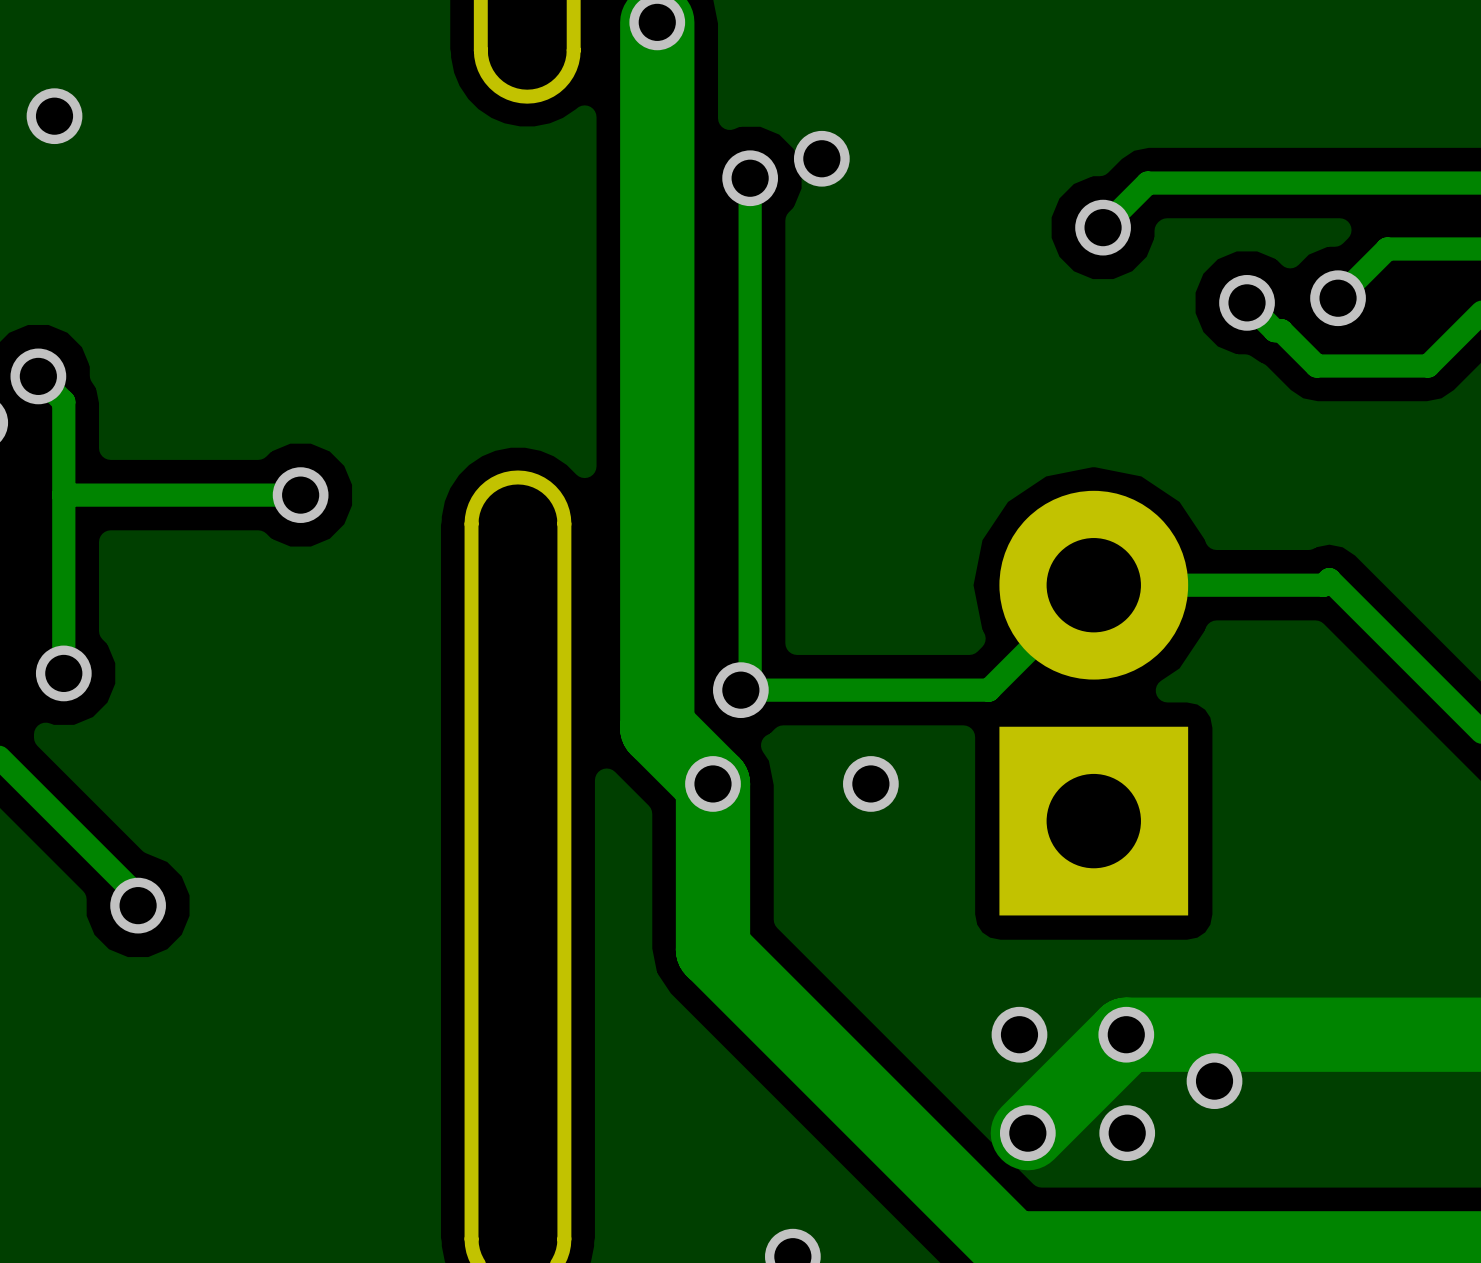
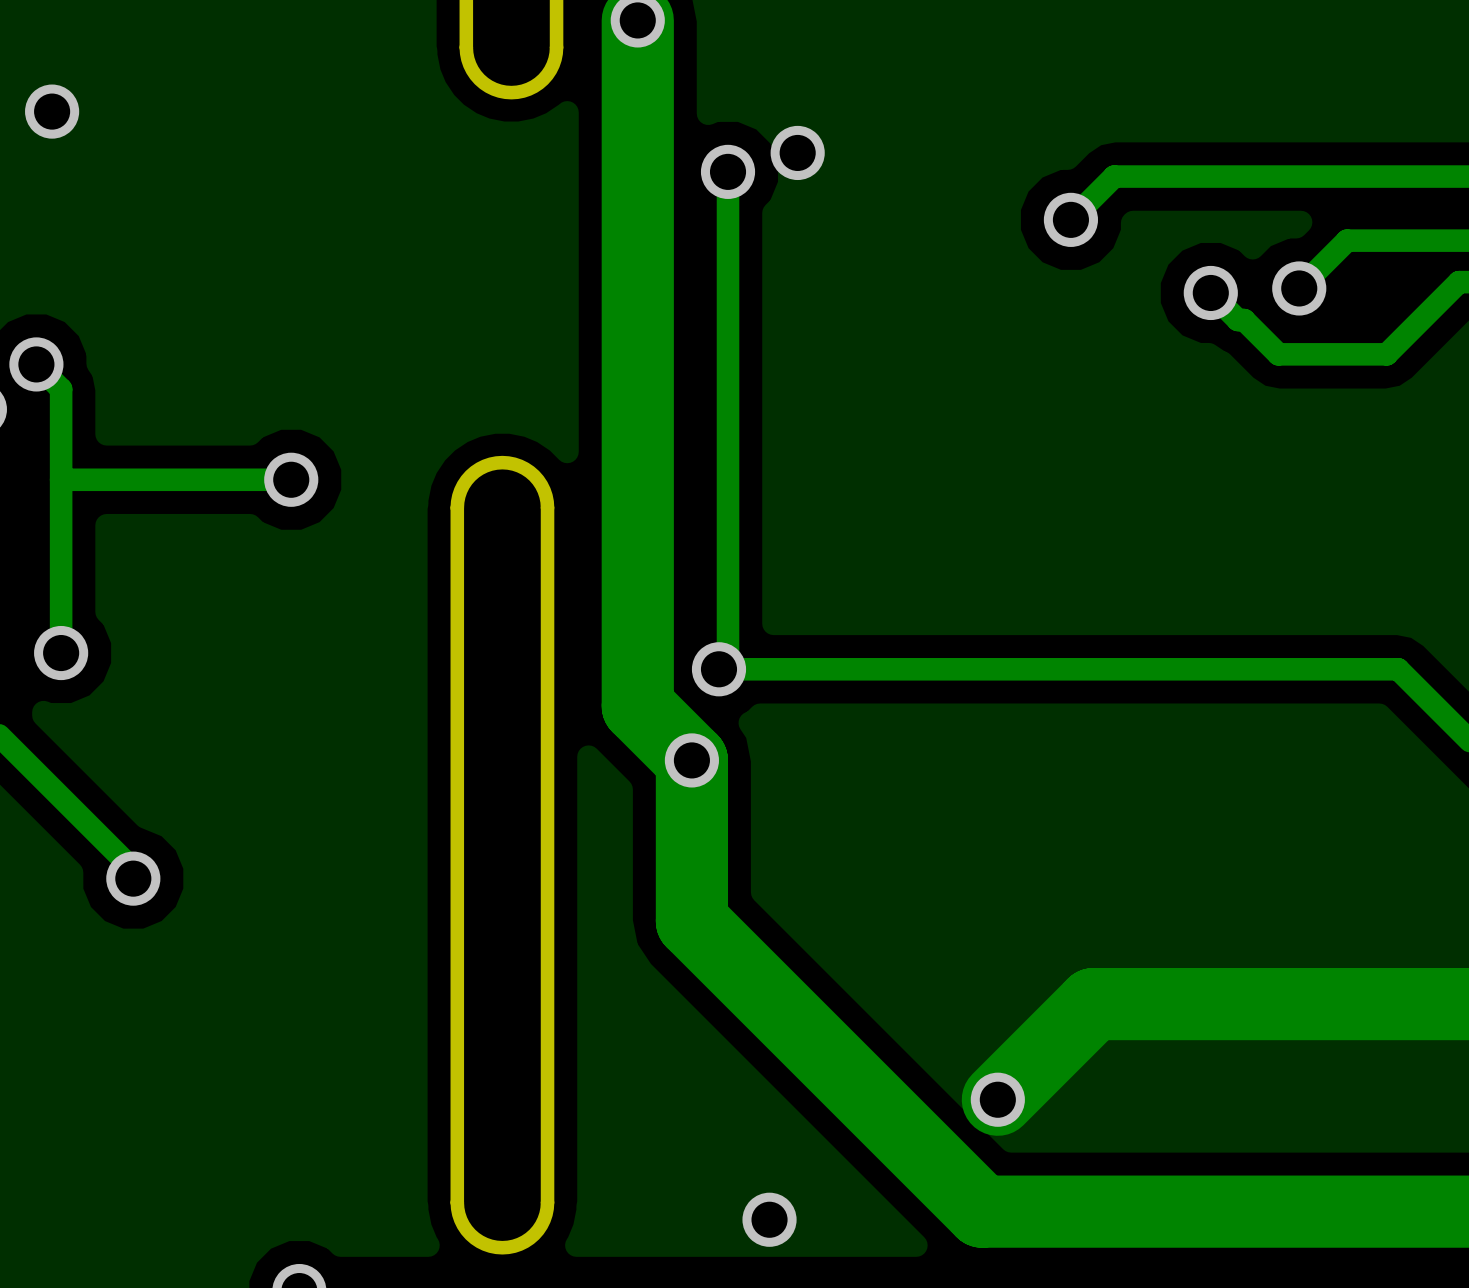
track: (1439, 690) (1329, 579) (1323, 585) (1093, 585) (988, 690) -> (1398, 669) (959, 669)
part: (1093, 703) -> none
via: (870, 783) -> none
via: (1019, 1034) -> none
via: (1126, 1034) -> none
via: (1214, 1081) -> none
via: (1127, 1133) -> none

